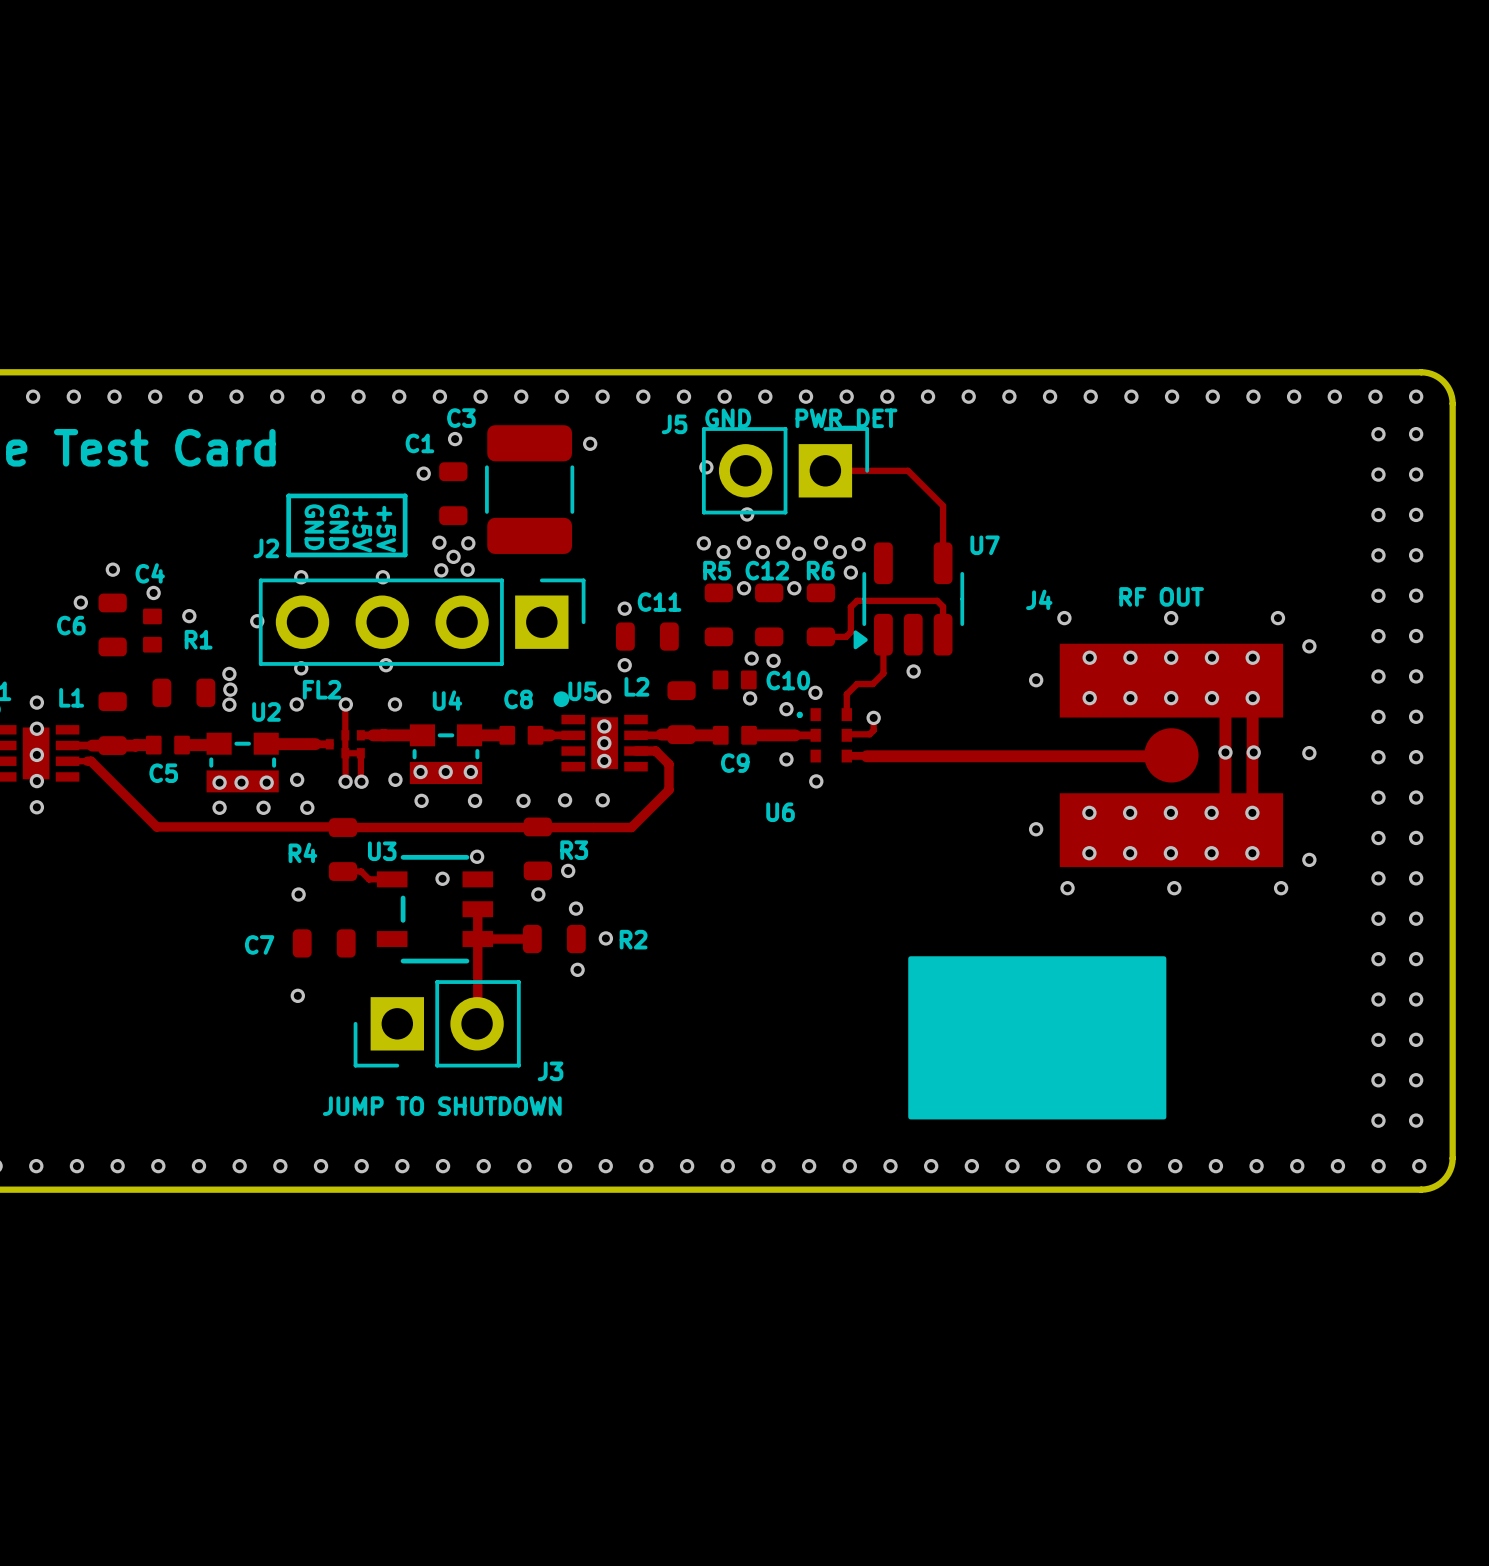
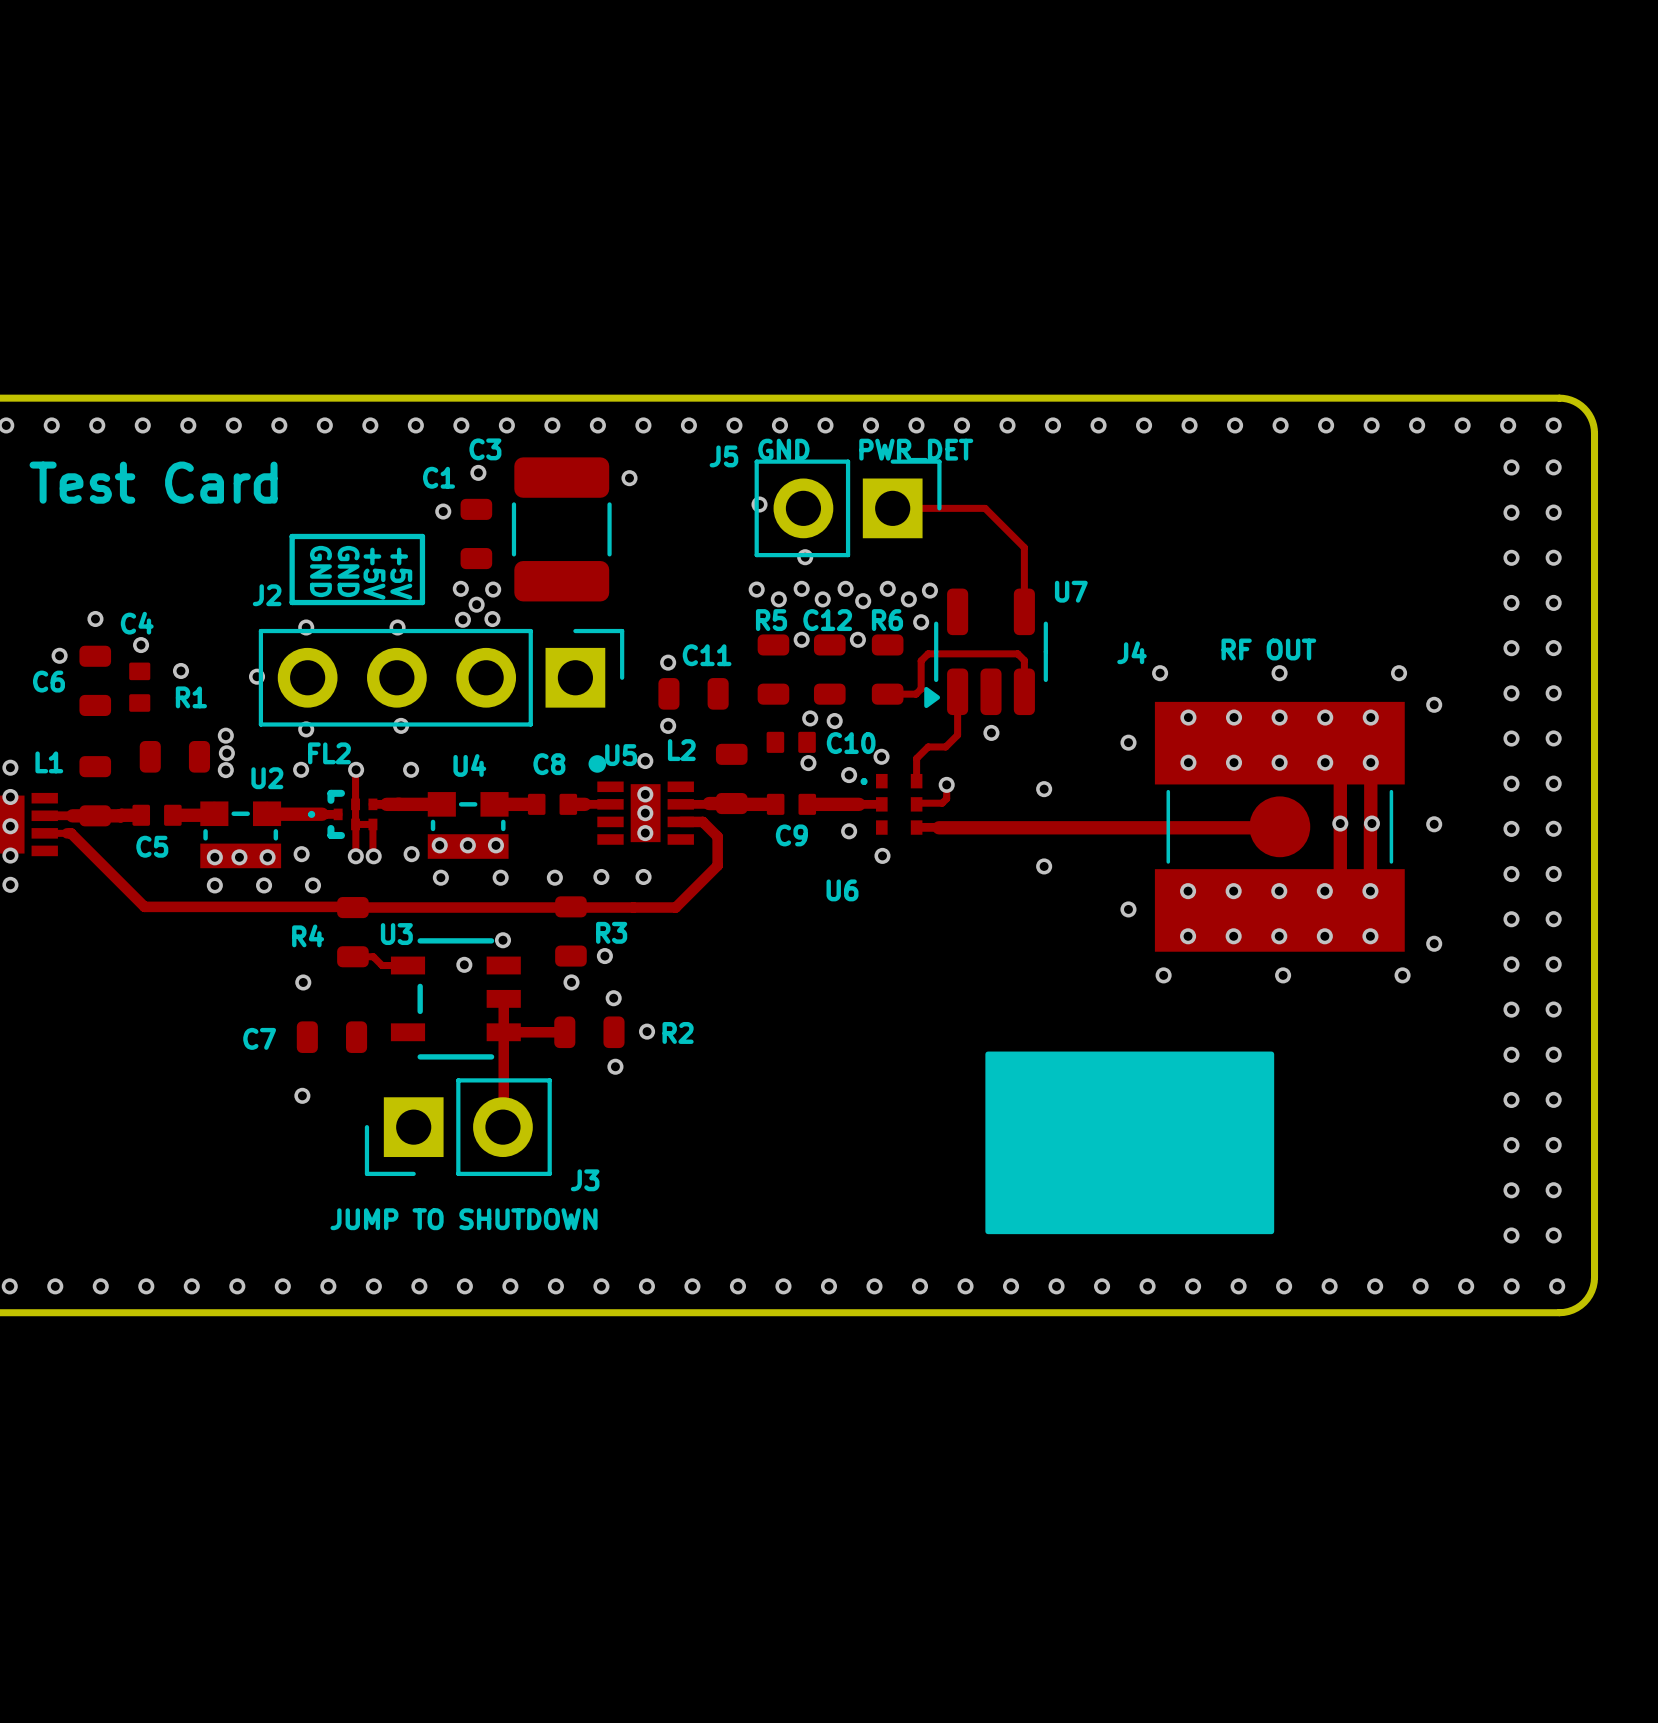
J4 footprint: [1059, 643, 1284, 868] -> [1154, 701, 1405, 952]
via: none -> (1044, 789)
FL2 footprint: [325, 730, 365, 759] -> [308, 789, 378, 840]
via: none -> (1044, 866)

